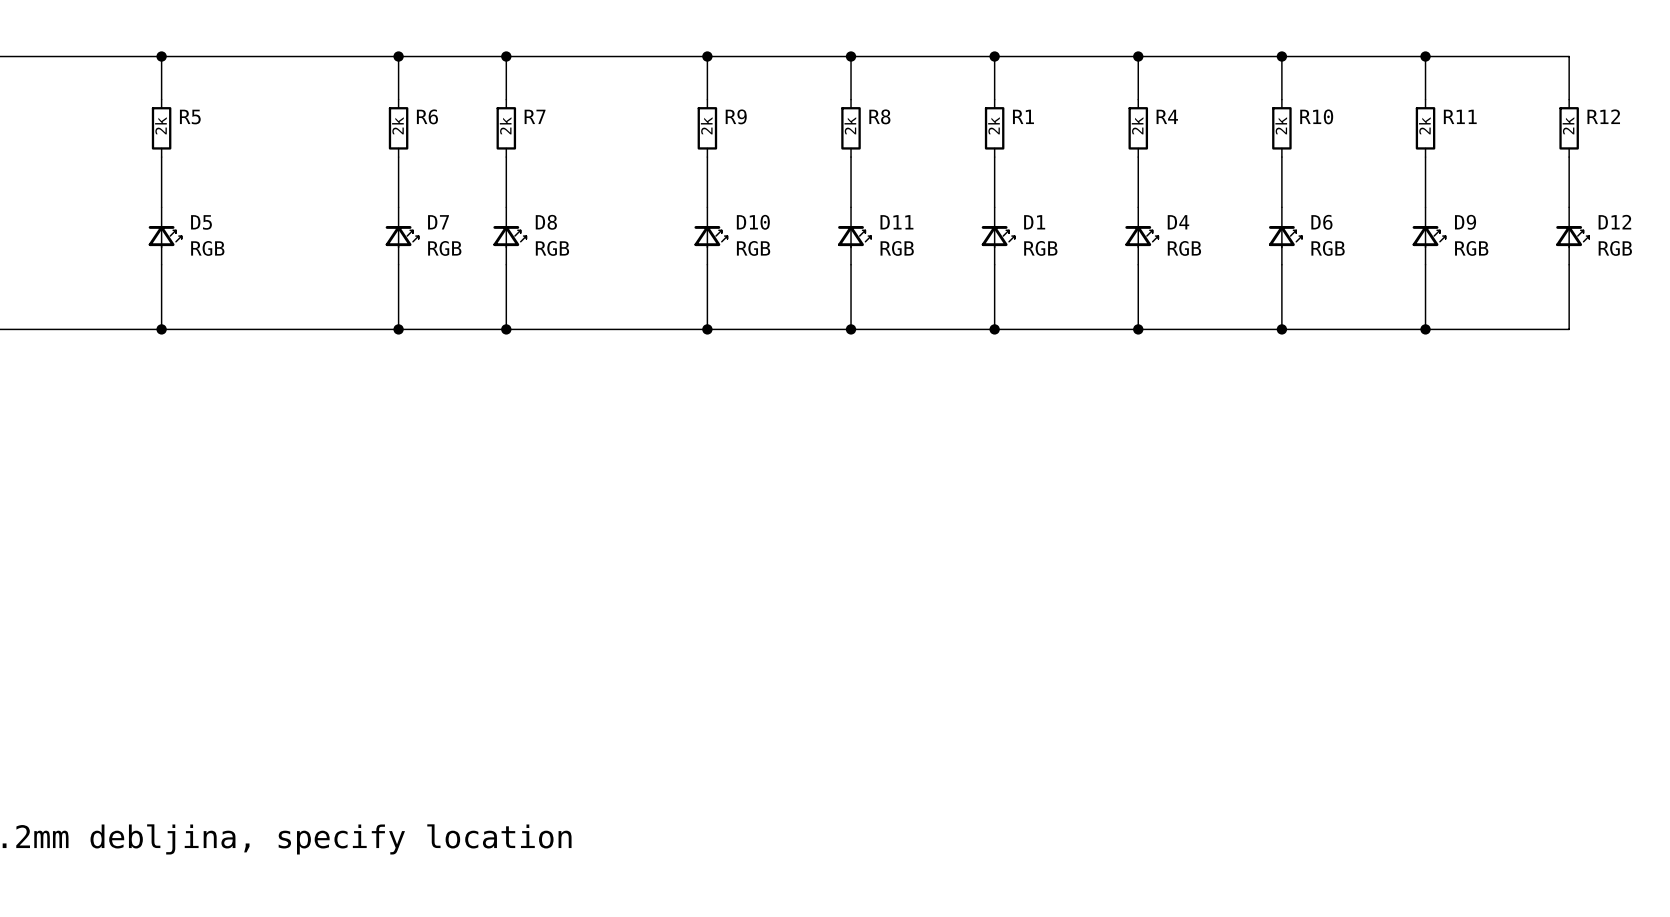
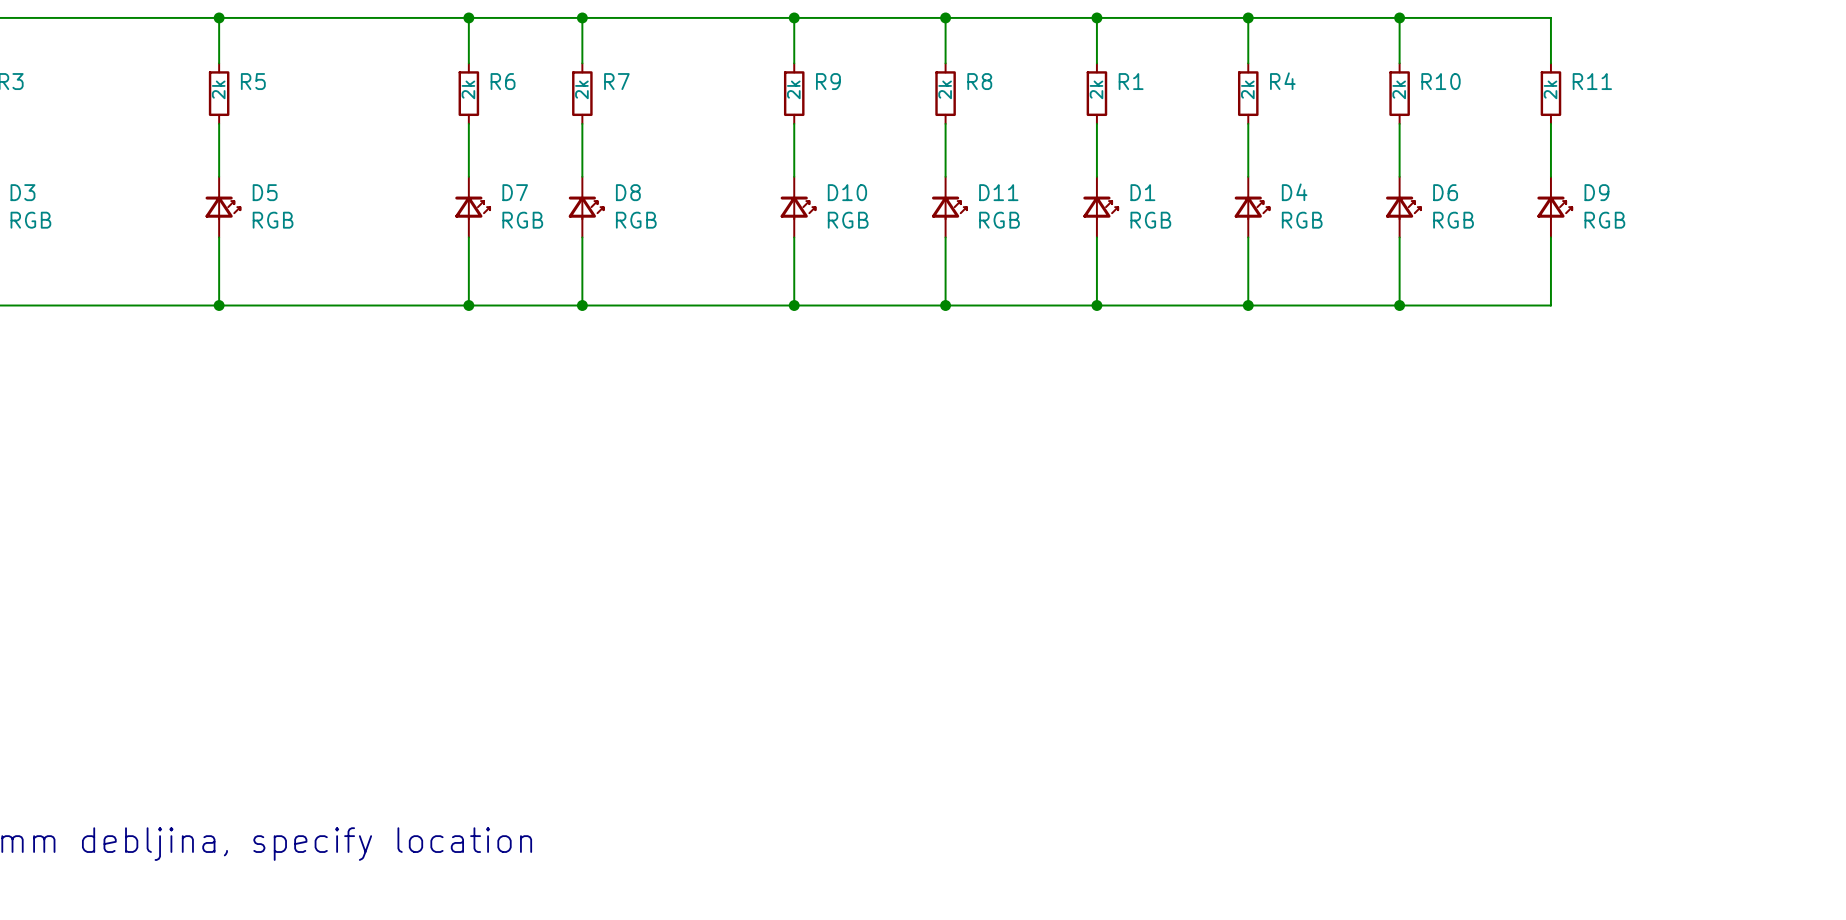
wire: (1425, 56) (1569, 56) (1569, 99) -> none
junction: (1425, 56) -> none
R12: 2k (1569, 128) -> none
wire: (1569, 157) (1569, 207) -> none
D12: RGB (1572, 236) -> none
wire: (1569, 264) (1569, 329) (1425, 329) -> none
junction: (1425, 329) -> none

